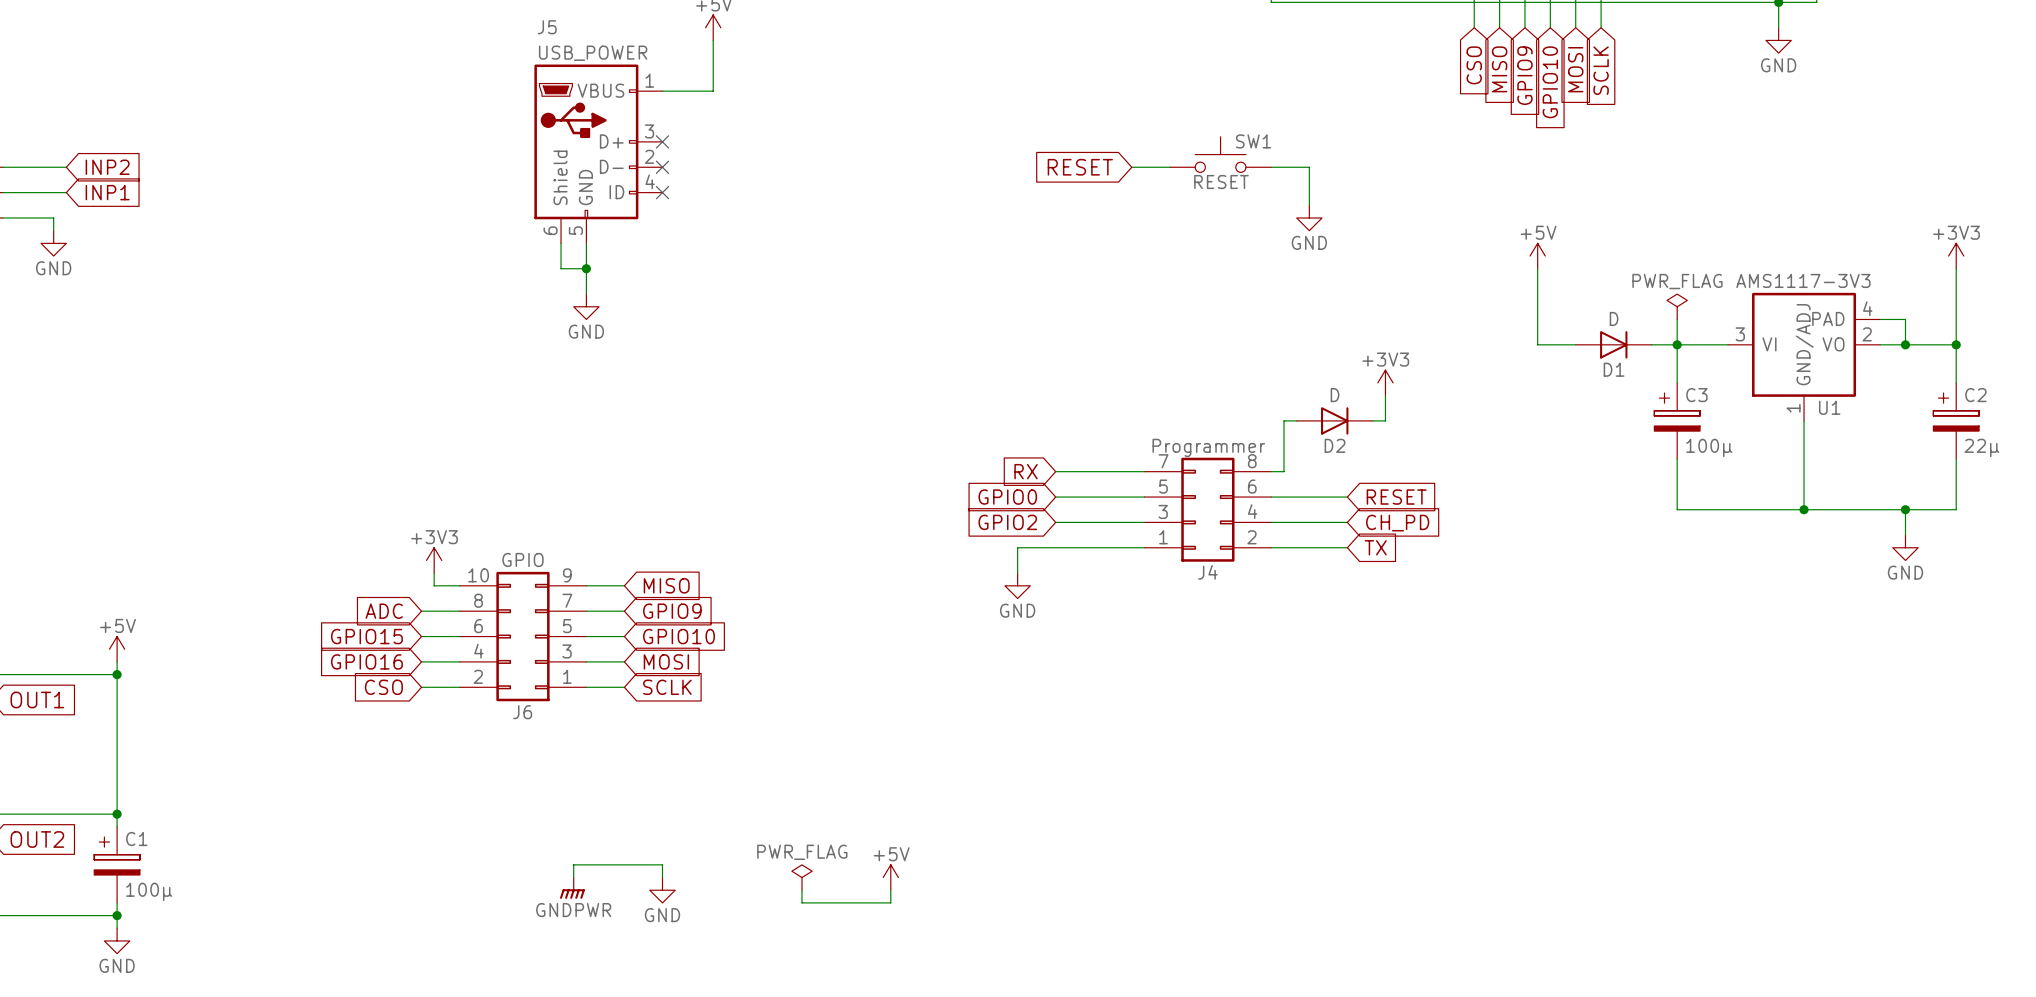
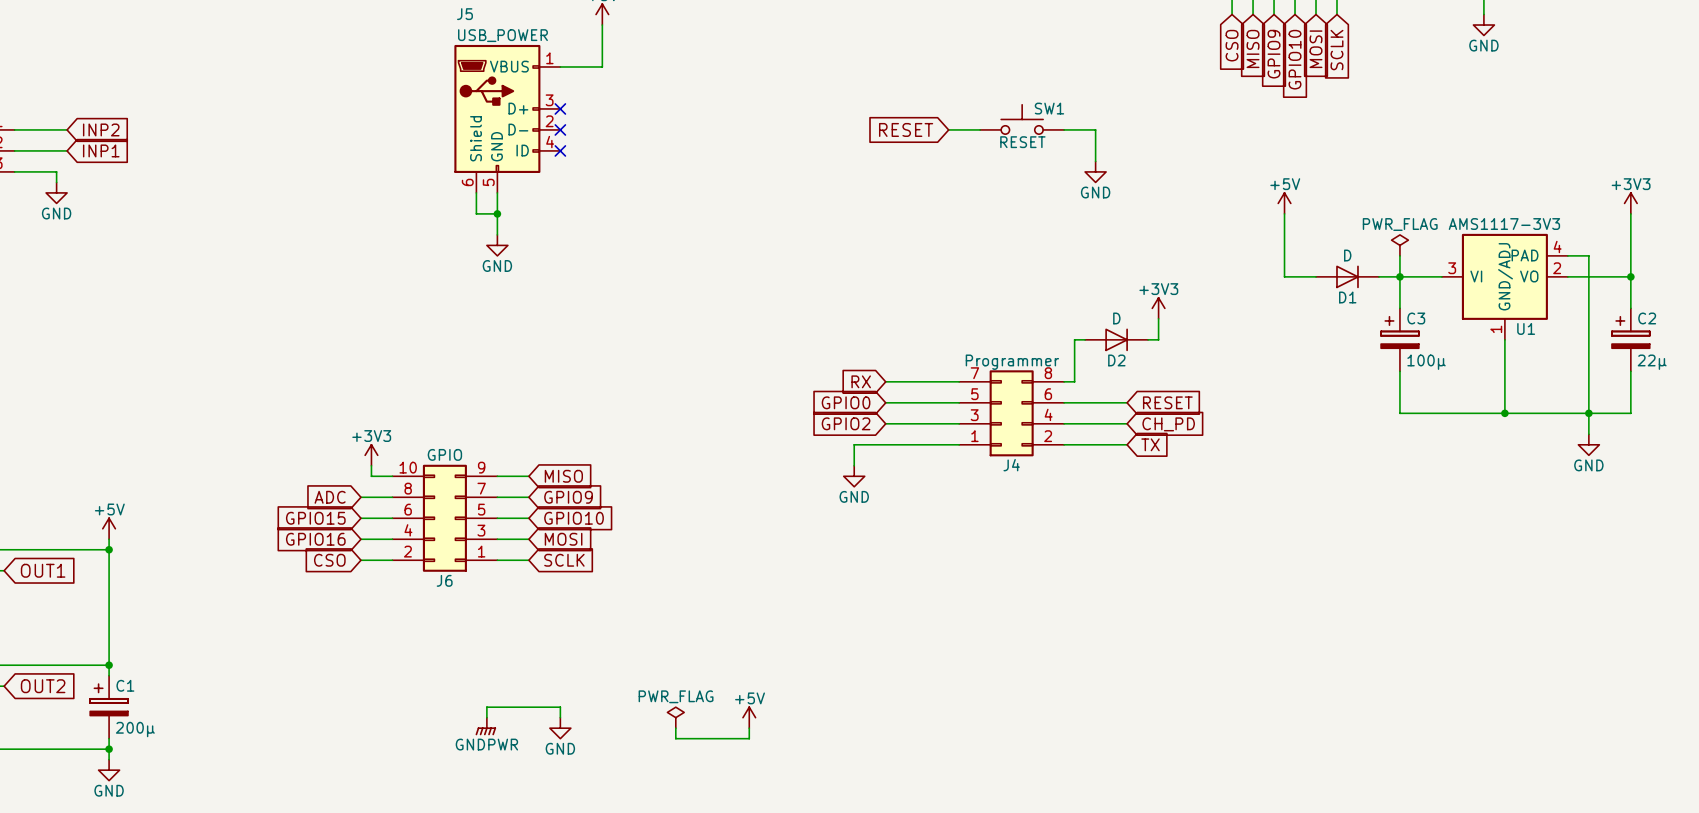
wire: none -> (1588, 276) (1588, 413)
junction: (1905, 344) -> none
C1 value: 100µ (149, 891) -> 200µ (135, 729)

